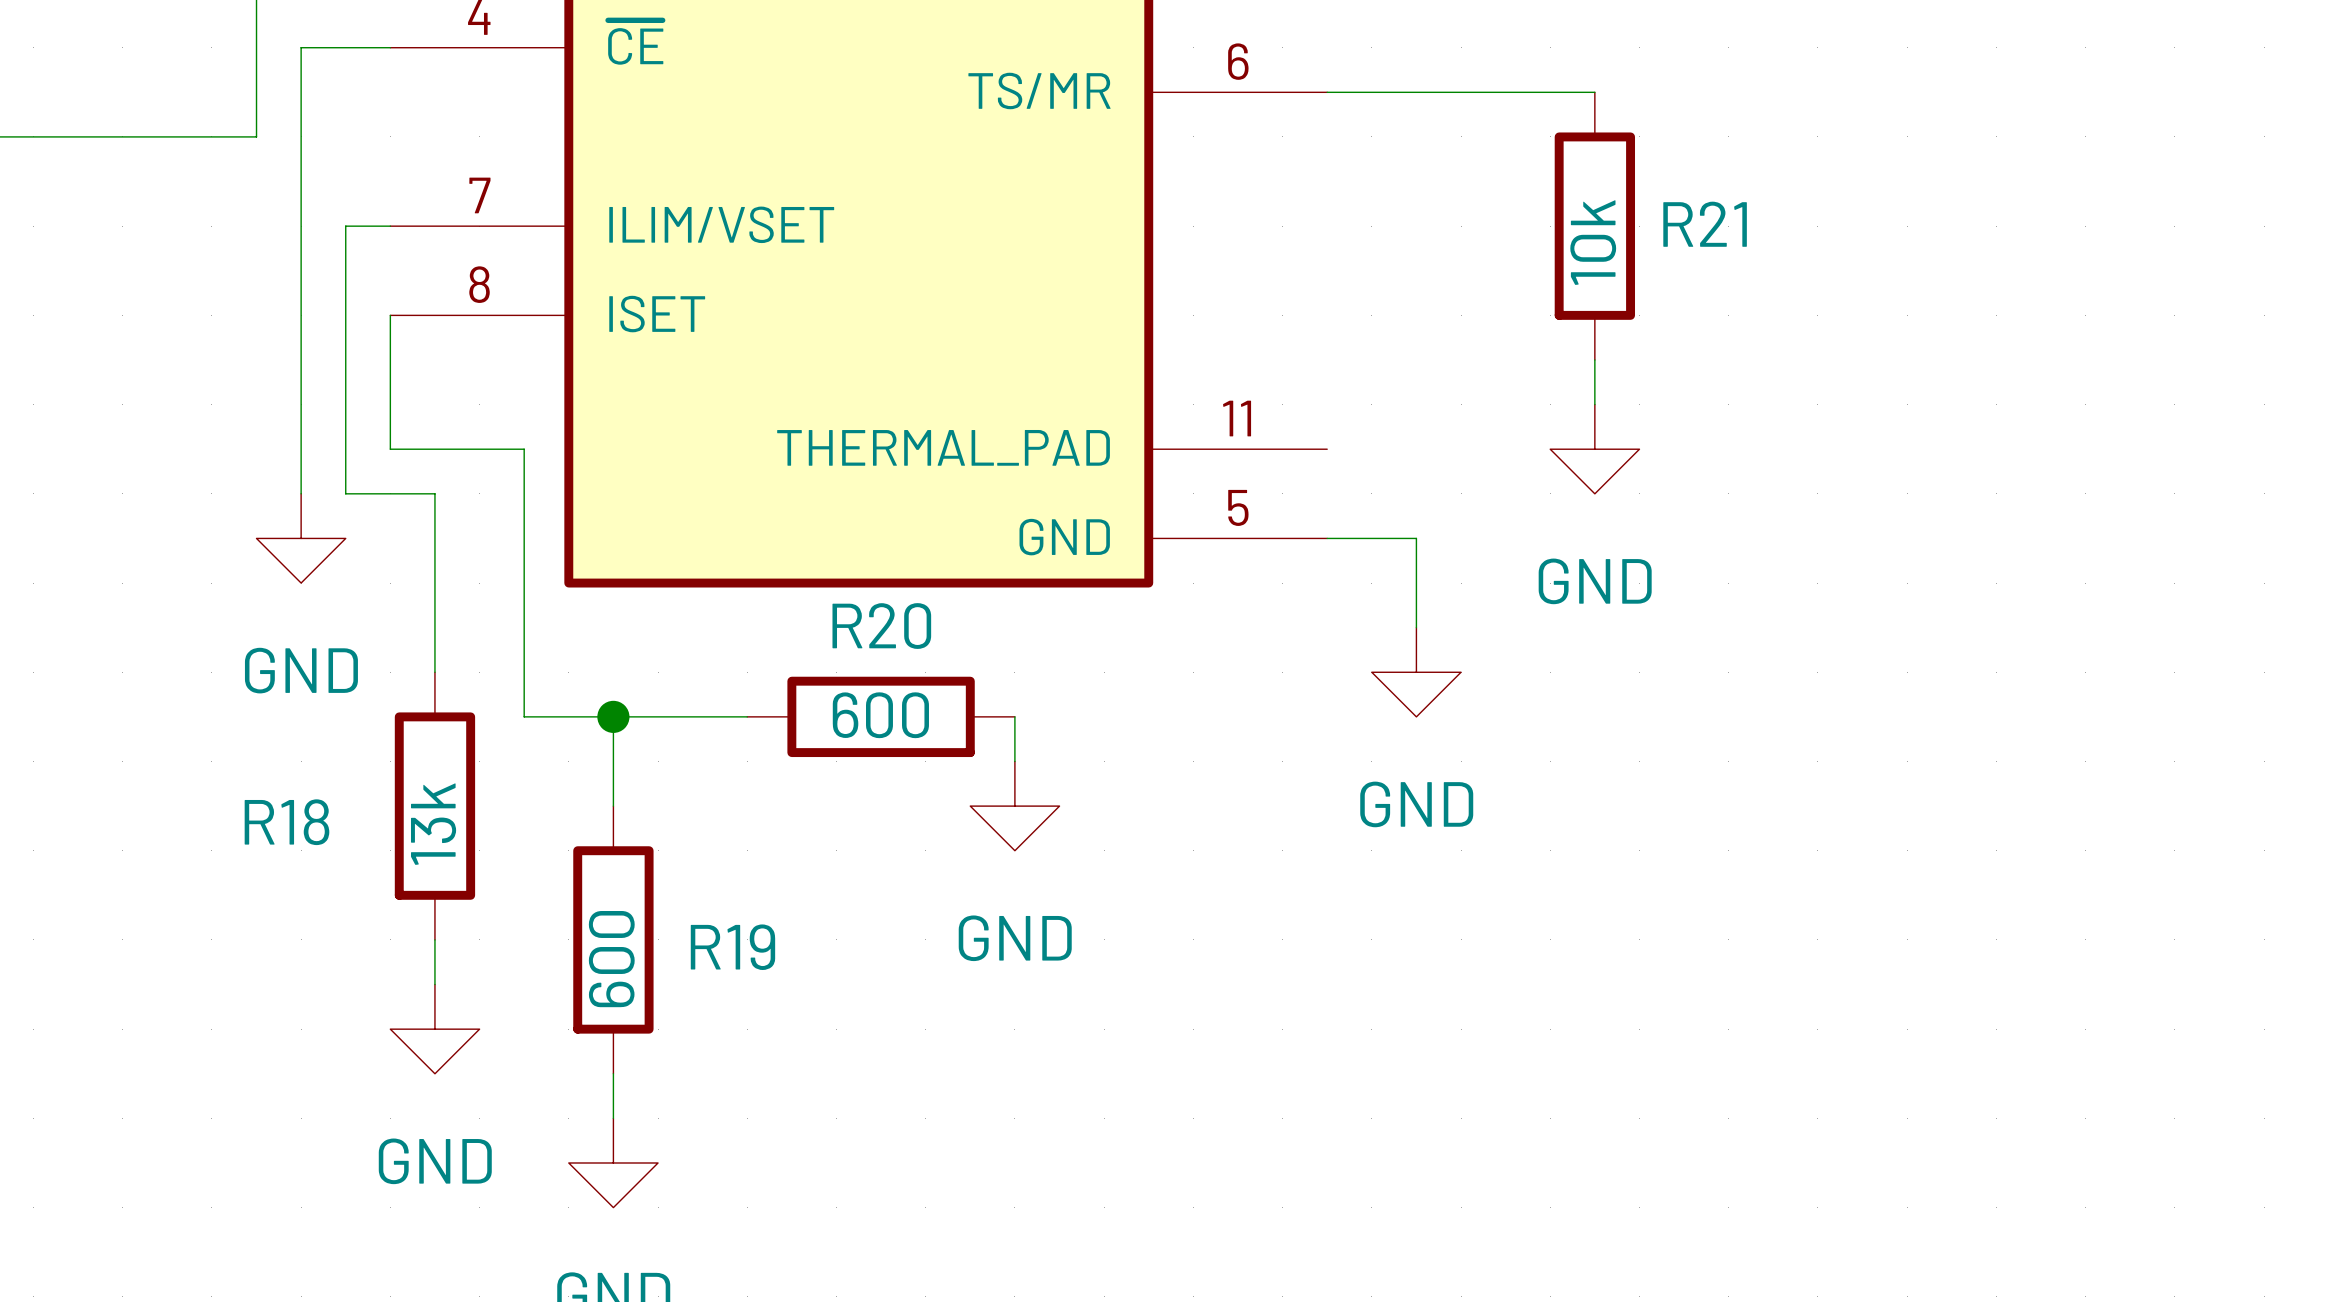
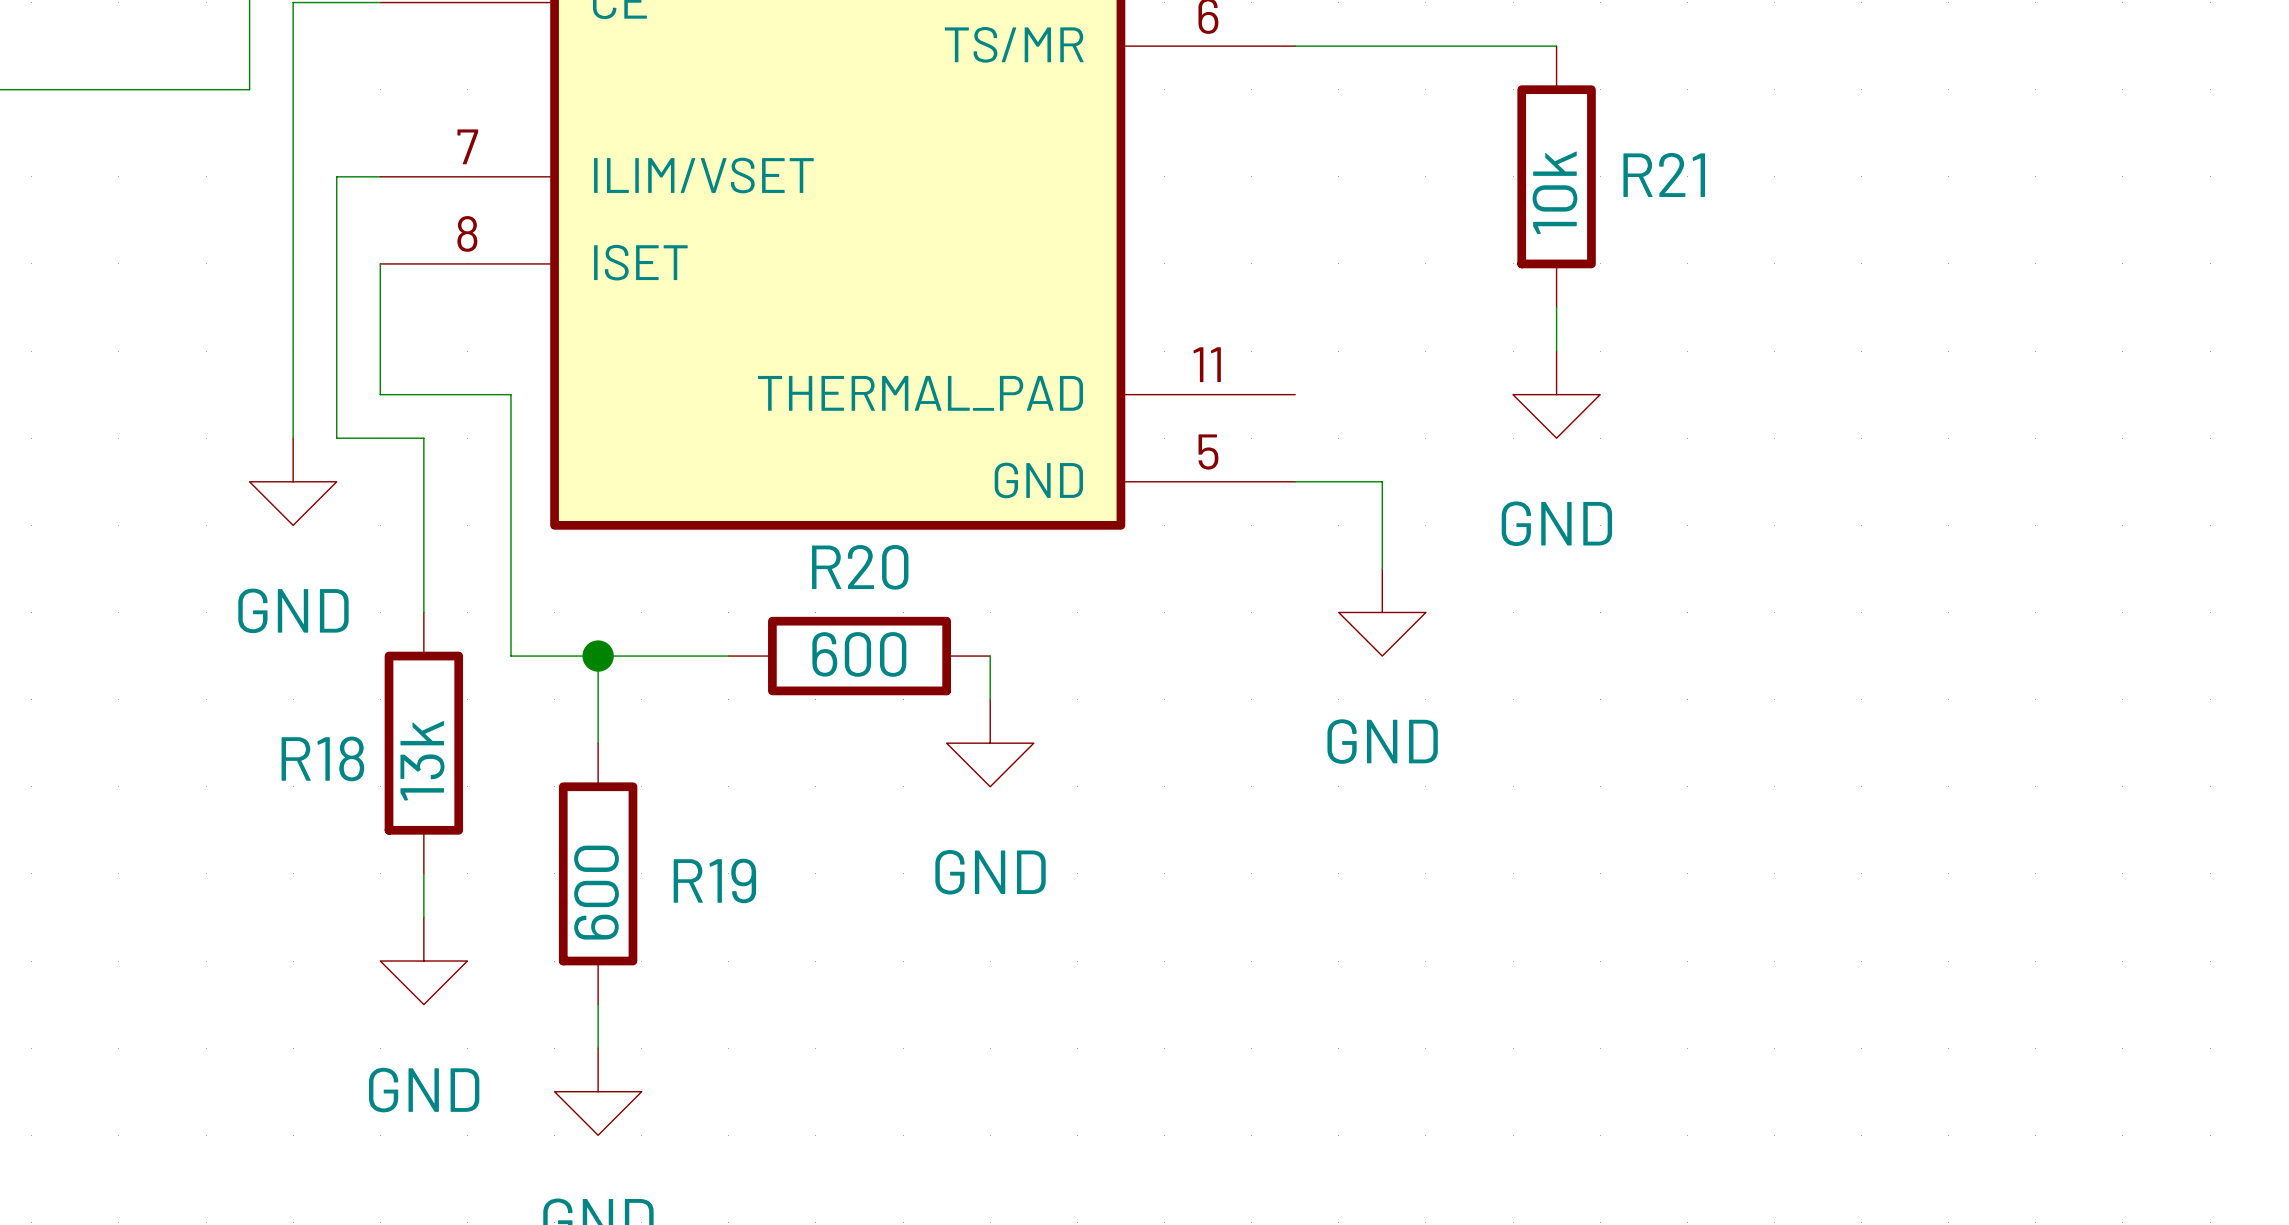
R18 name position: R18 (286, 822) -> R18 (322, 758)

